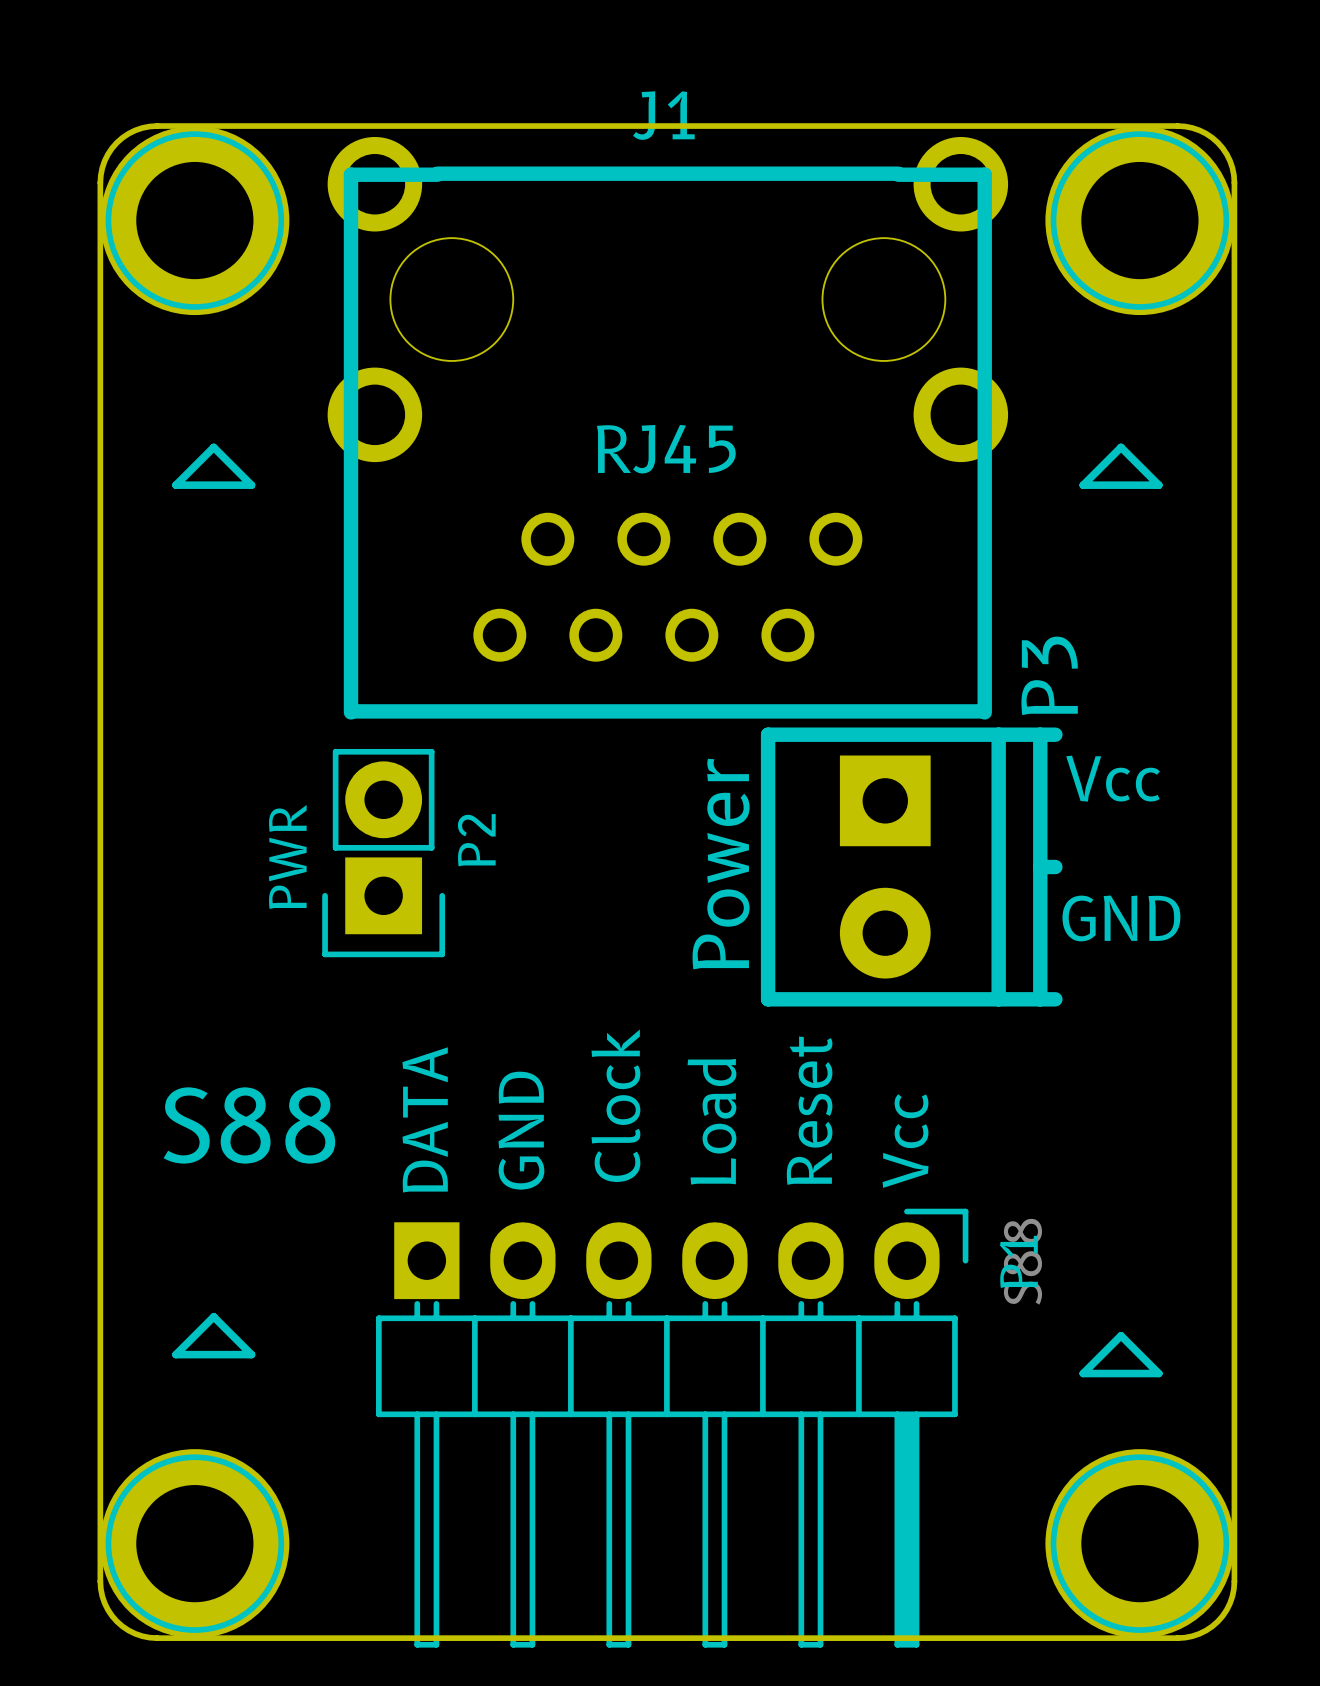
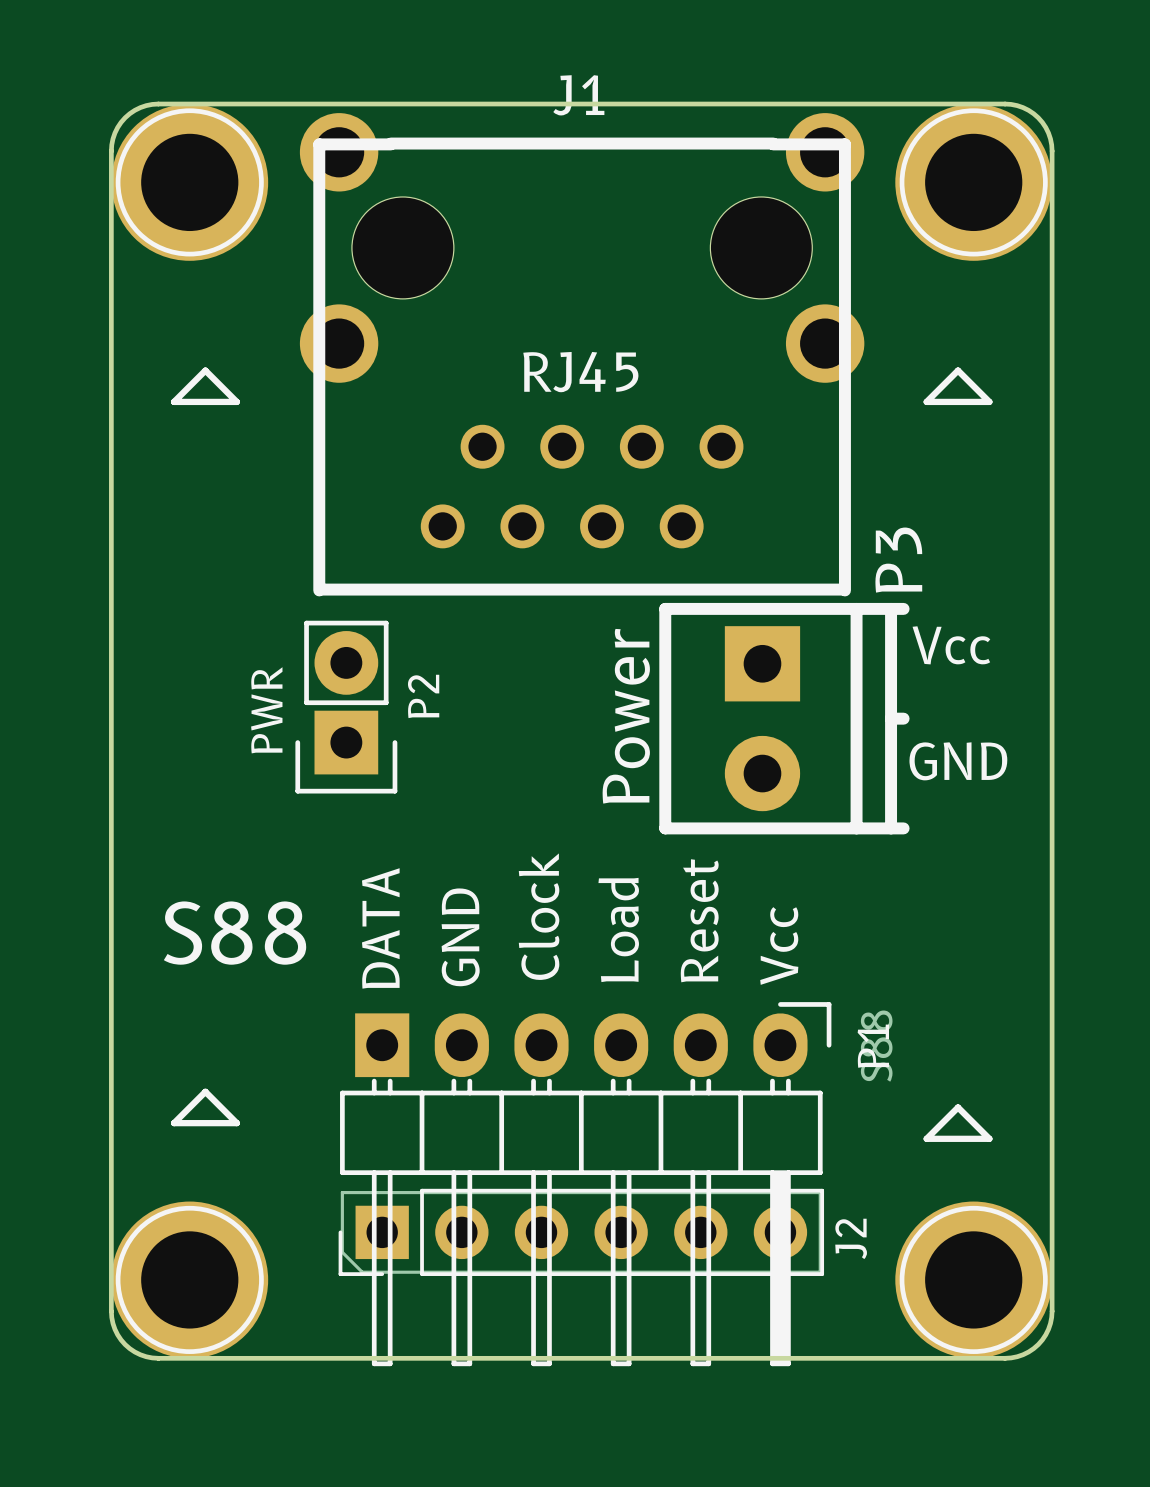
J2: none -> (581, 1232)

